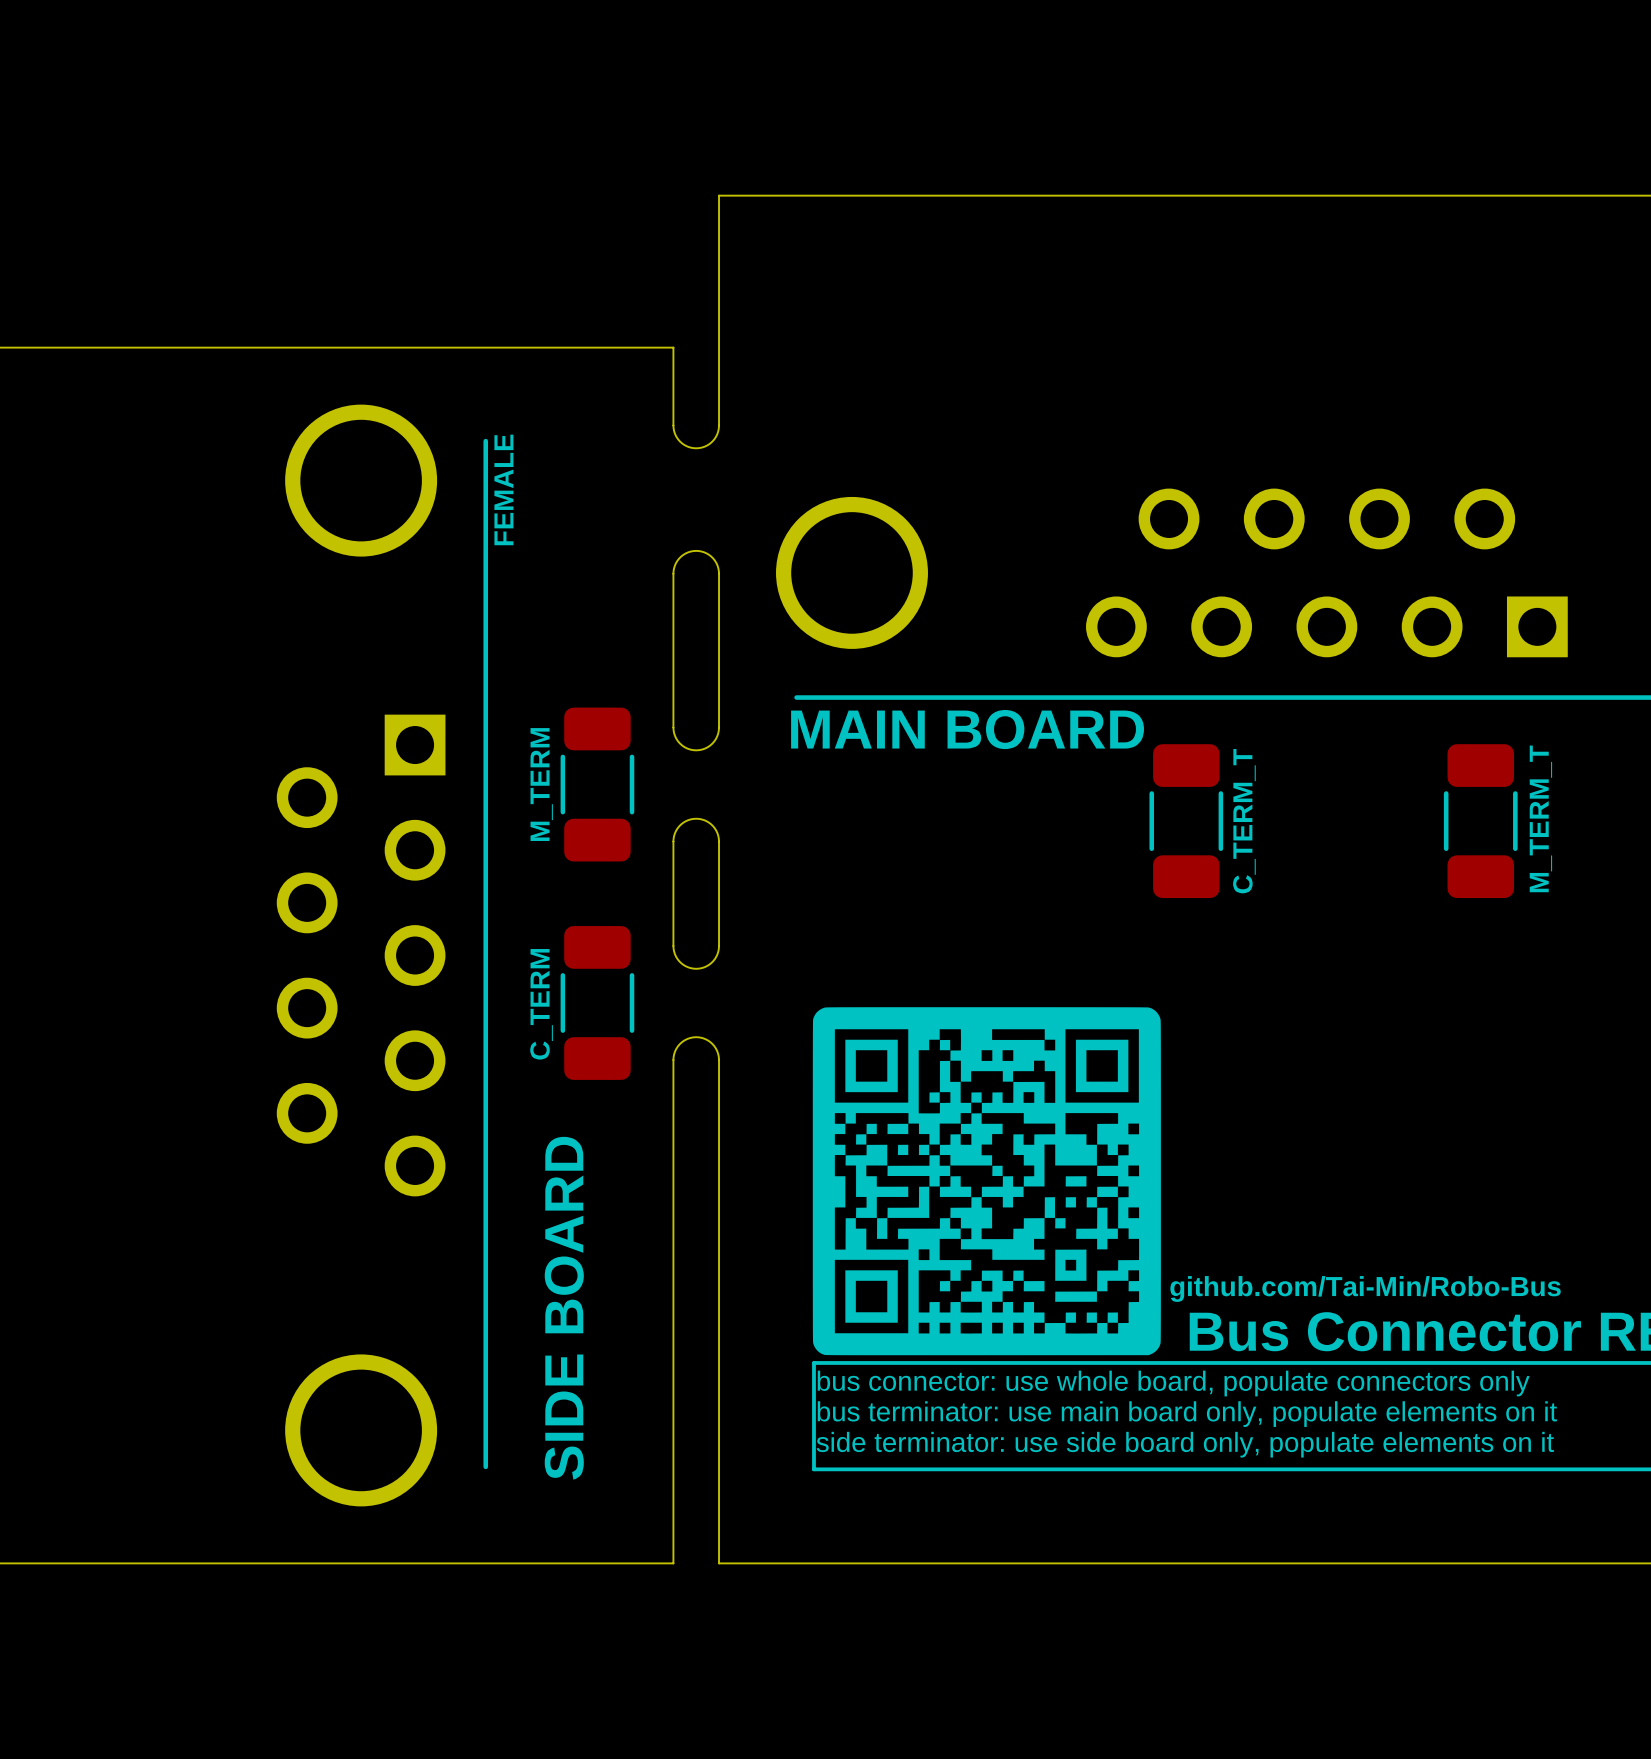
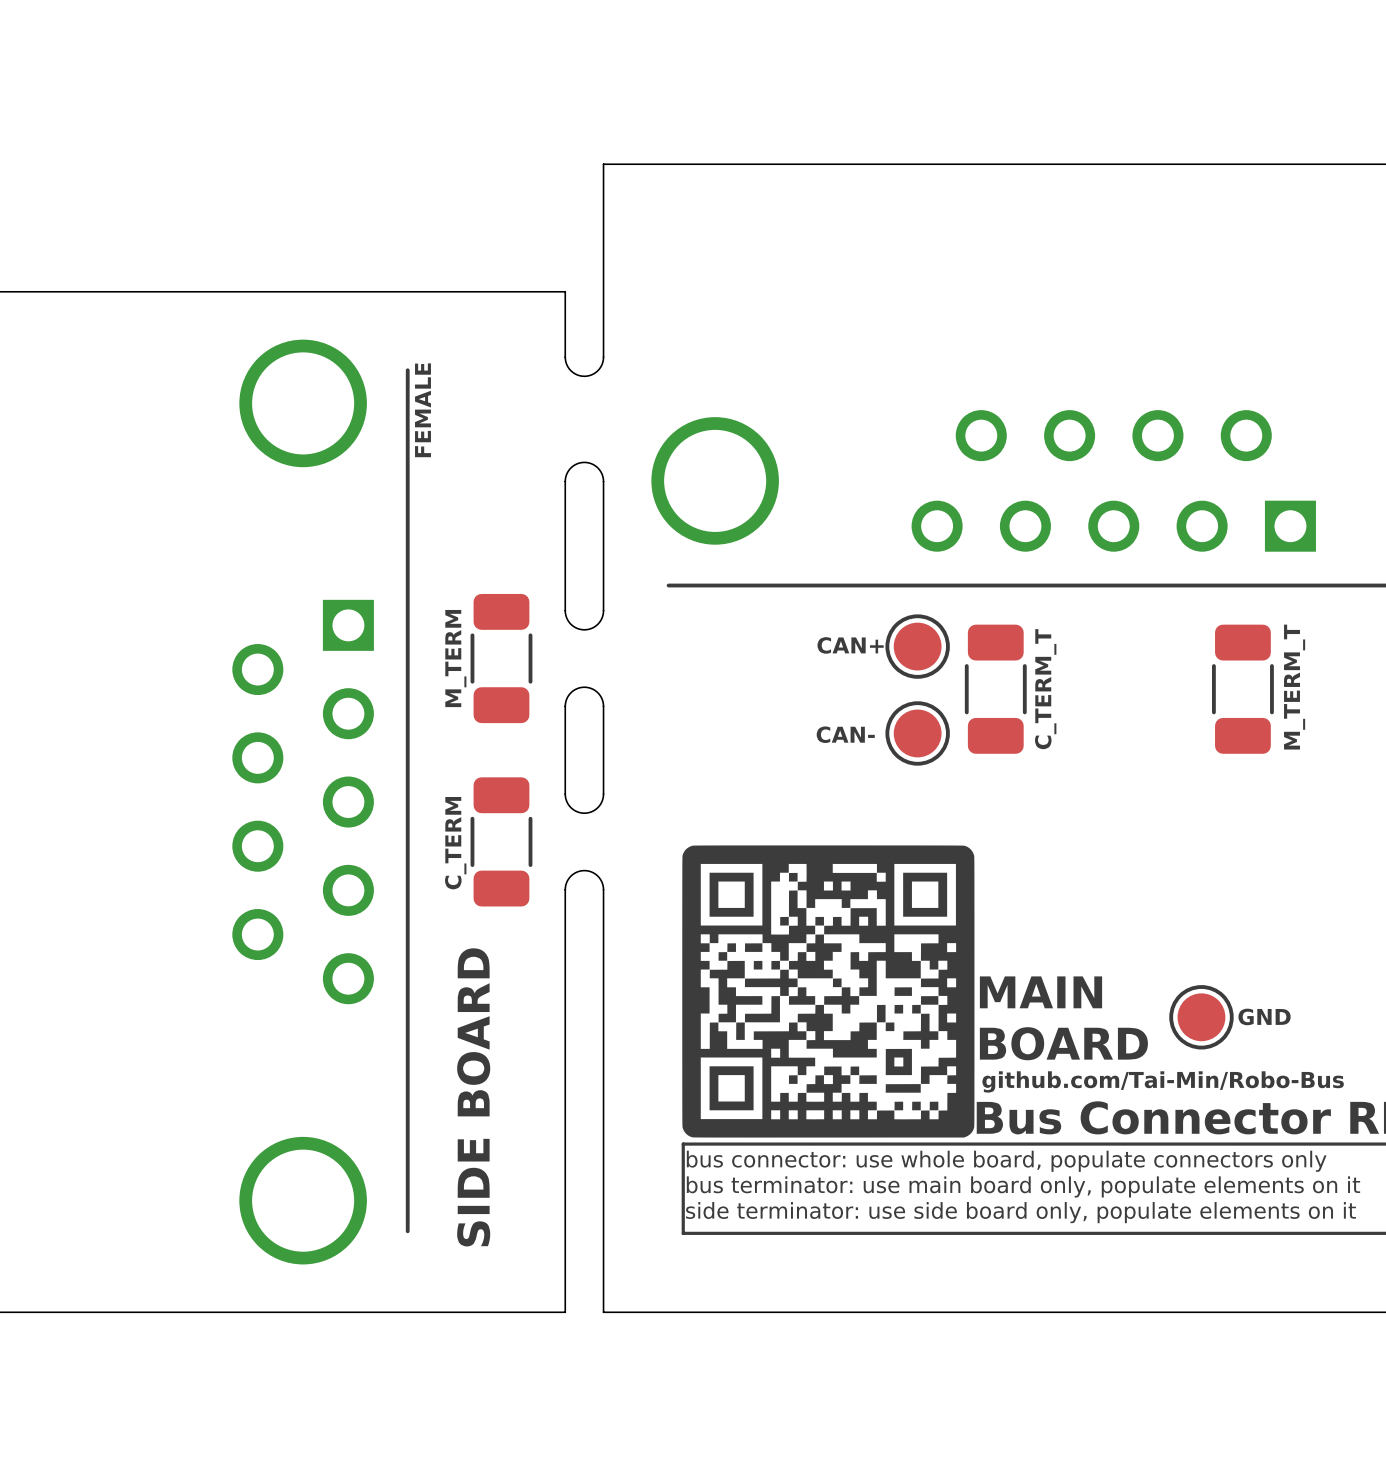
text: MAIN BOARD (967, 729) -> none
text: none -> CAN+ (850, 645)
part: none -> (917, 646)
part: none -> (917, 733)
text: none -> CAN- (845, 734)
text: none -> MAIN (1040, 992)
part: none -> (1201, 1017)
text: none -> GND (1264, 1016)
text: none -> BOARD (1063, 1043)

